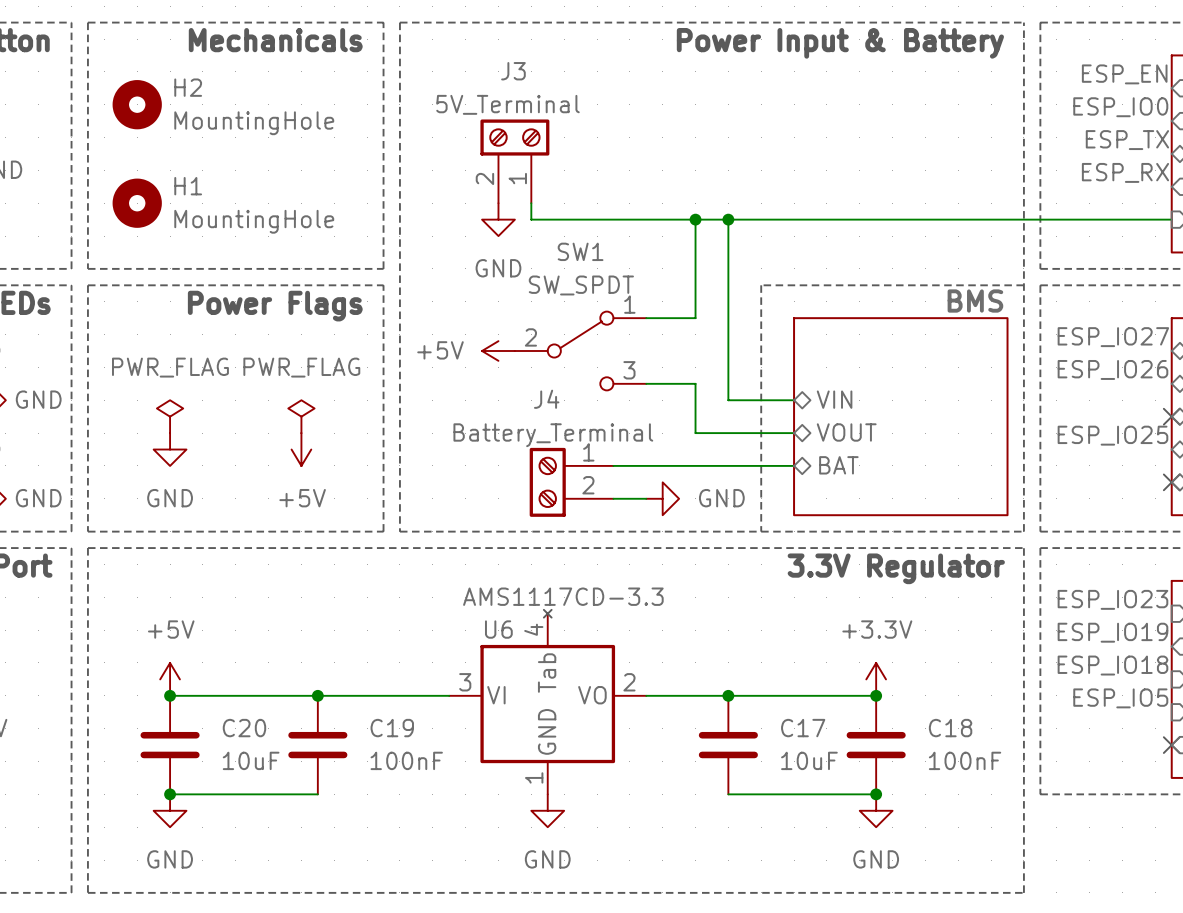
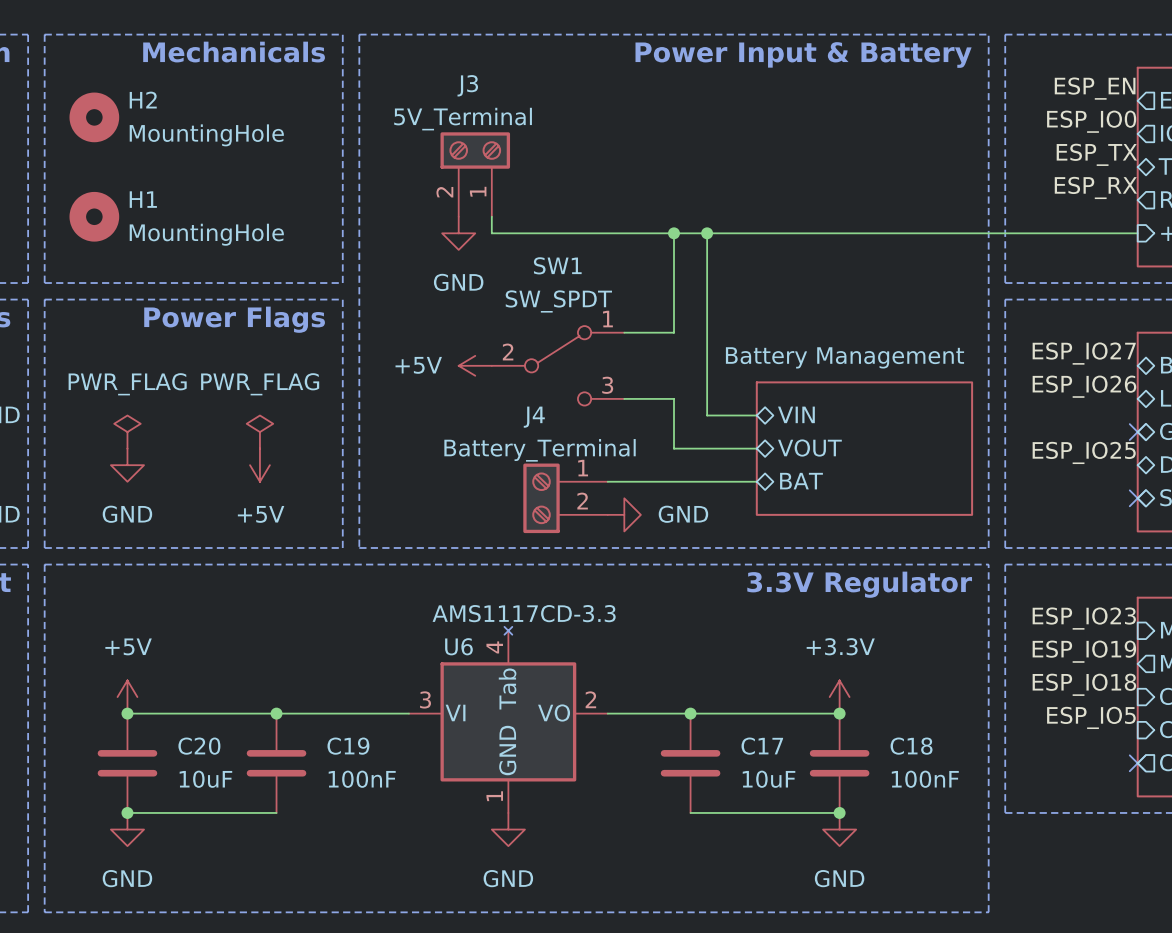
wire: (695, 219) (695, 318) -> (674, 233) (674, 332) (657, 332)
junction: (695, 219) -> none
junction: none -> (674, 233)
wire: (728, 219) (728, 400) (744, 400) -> (707, 233) (707, 415)
junction: (728, 219) -> none
junction: none -> (707, 233)
line: (1023, 285) (761, 285) (761, 531) -> none
power symbol position: +5V (498, 350) -> +5V (475, 365)
SW1 position: (580, 350) -> (558, 365)
wire: (695, 383) (695, 433) (711, 433) -> (657, 398) (674, 398) (674, 448)
sheet BMS: (900, 416) -> none
sheet Battery Management: none -> (864, 448)
J4 position: (571, 482) -> (565, 498)

